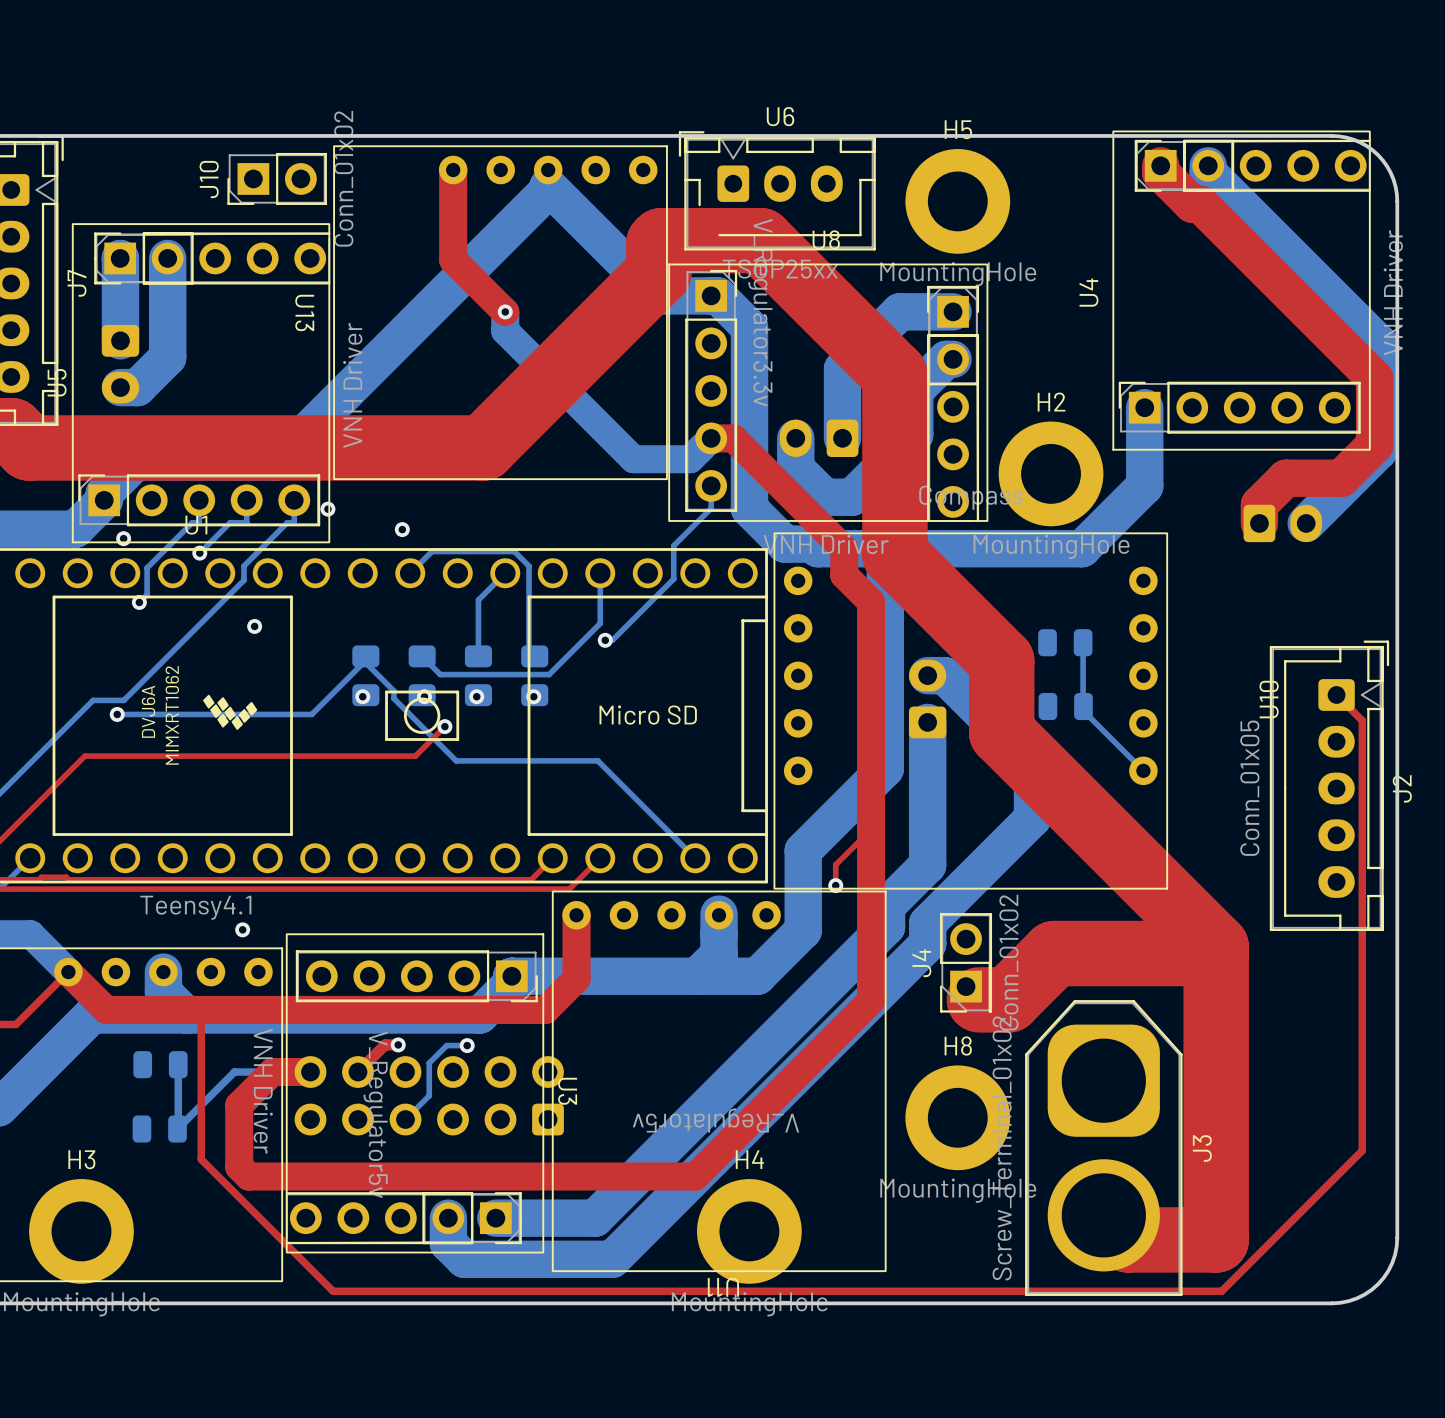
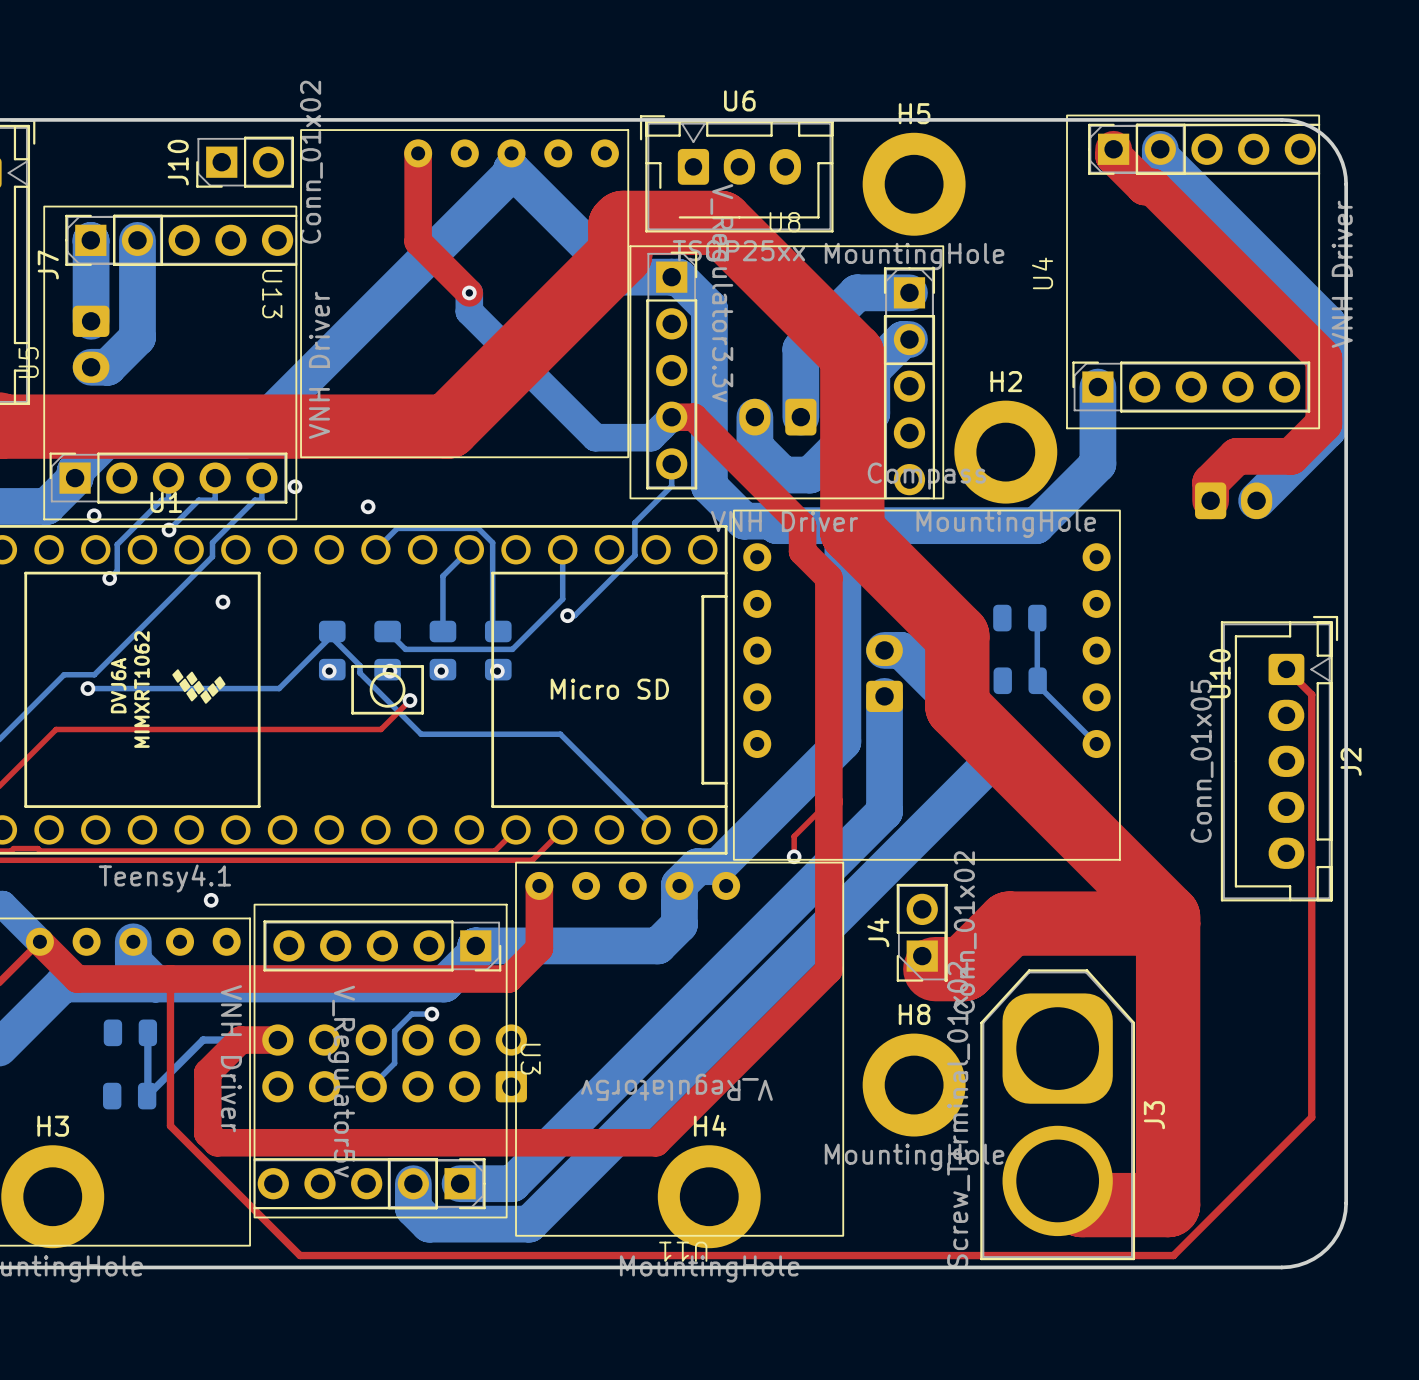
bottom track: (885, 768) (803, 850) (803, 930) (757, 976) (697, 976) -> (842, 741) (718, 866) (697, 866) (679, 884)
bottom track: (1032, 792) (1032, 818) (927, 923) (927, 943) (612, 1259) (566, 1259) -> (987, 765) (529, 1224)
bottom track: (927, 839) (927, 865) (886, 906) (886, 926) (595, 1218) (549, 1218) -> (884, 811) (512, 1183)
top track: (398, 1044) (385, 1044) (358, 1072) -> none
via: (398, 1044) -> none

